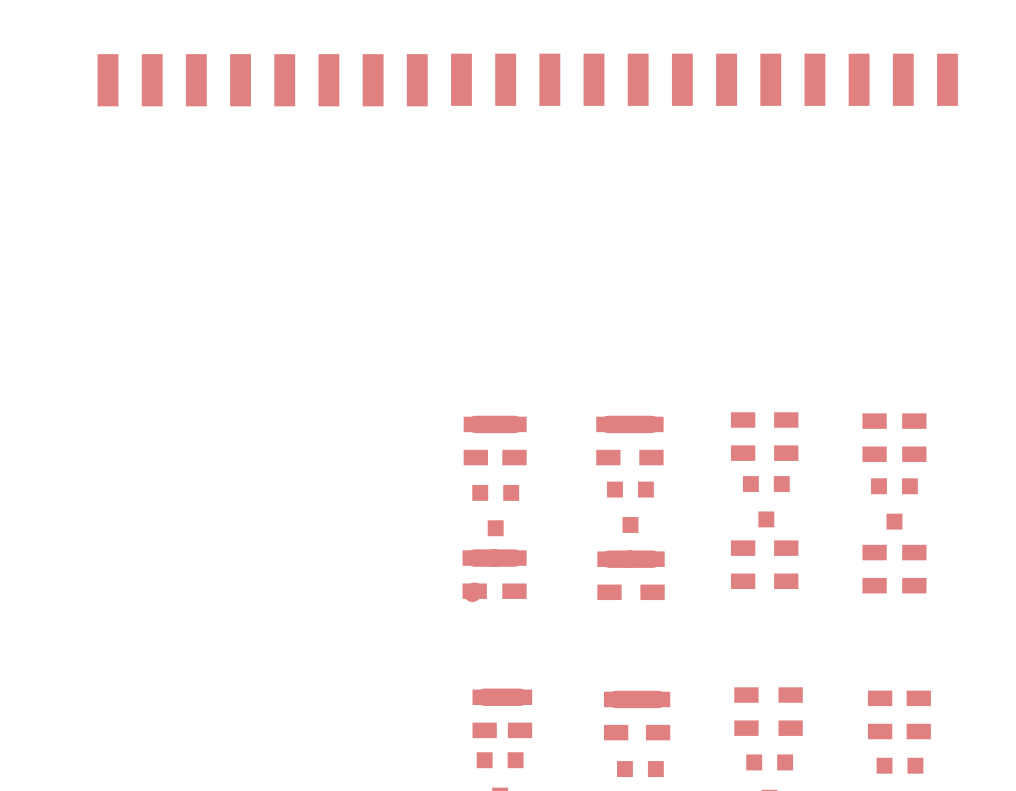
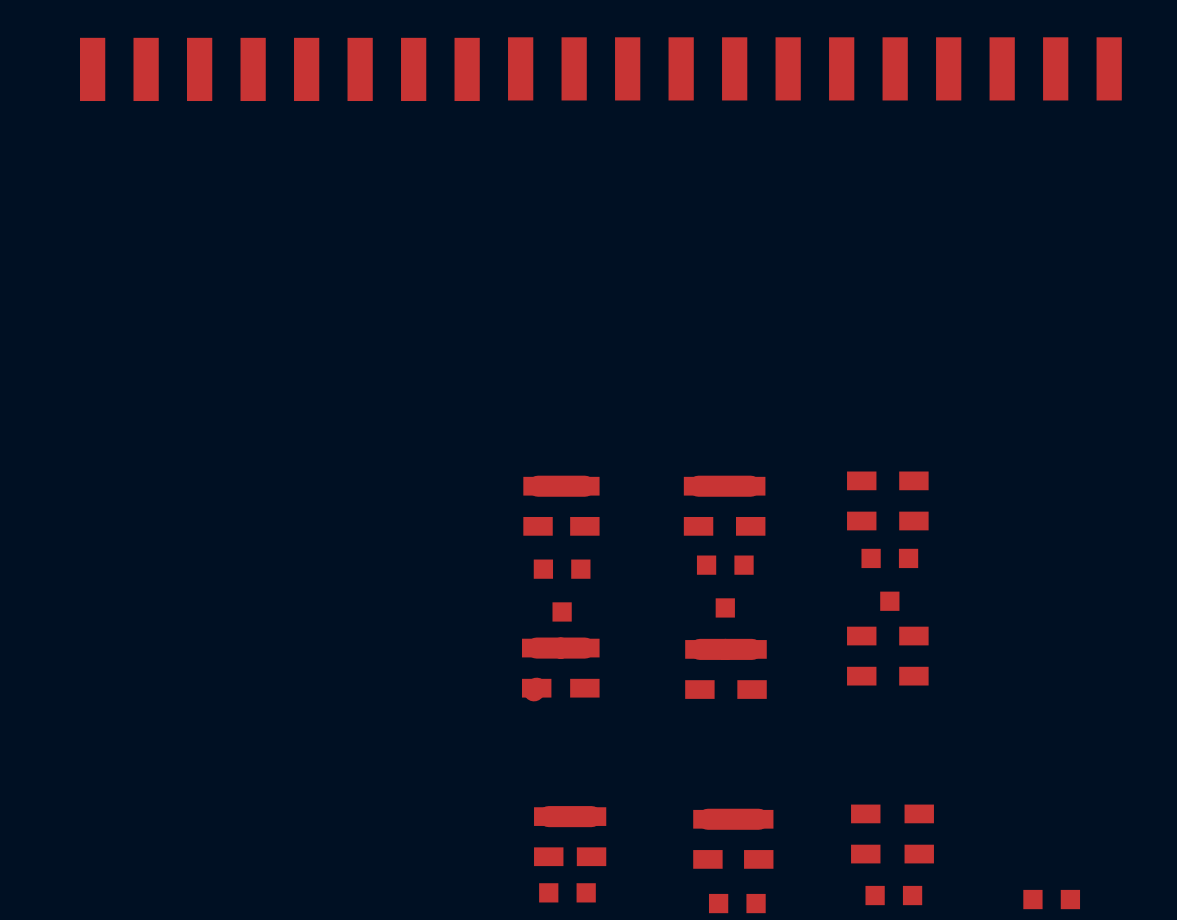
part: (874, 437) -> none
part: (914, 437) -> none
part: (894, 503) -> none
part: (874, 569) -> none
part: (914, 569) -> none
part: (880, 714) -> none
part: (918, 714) -> none

